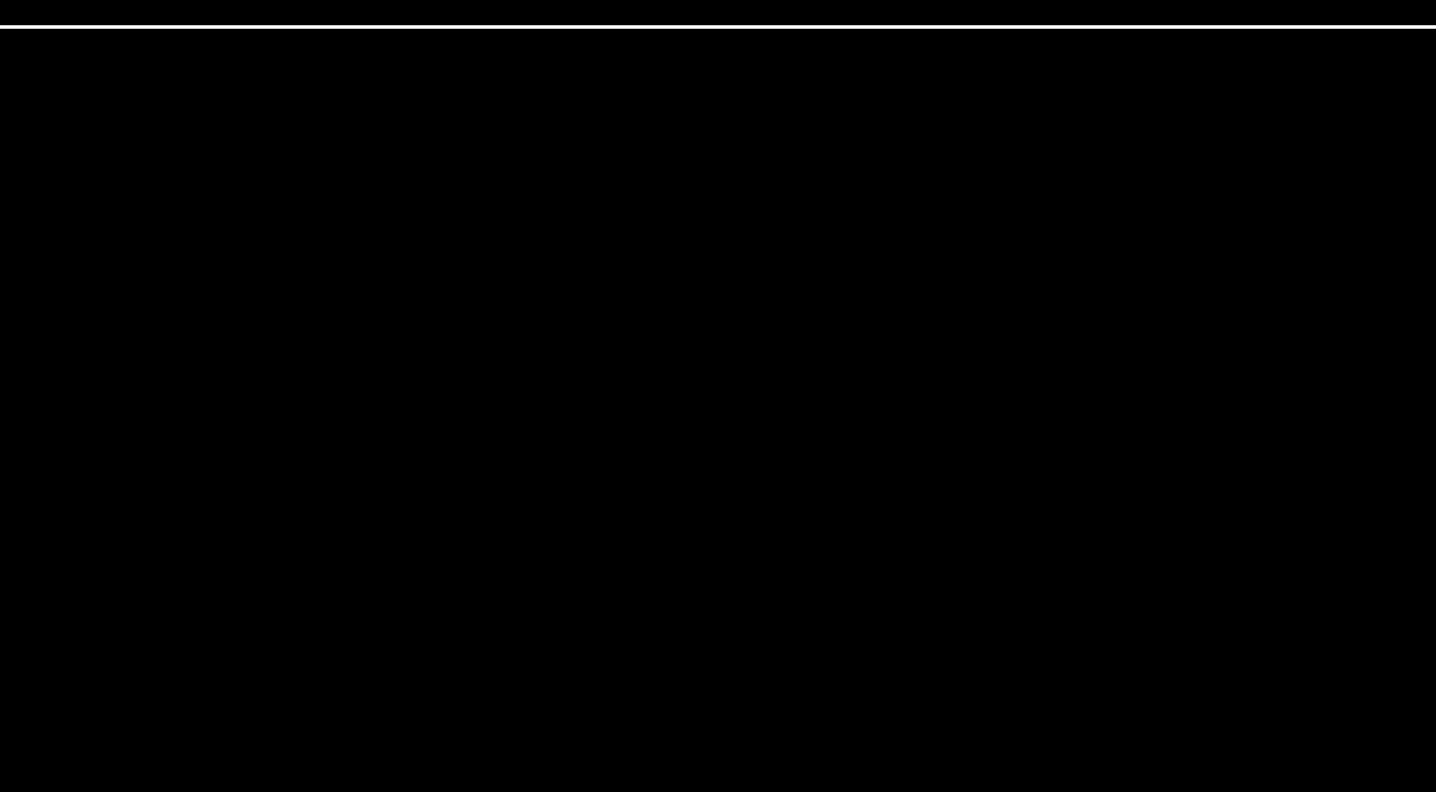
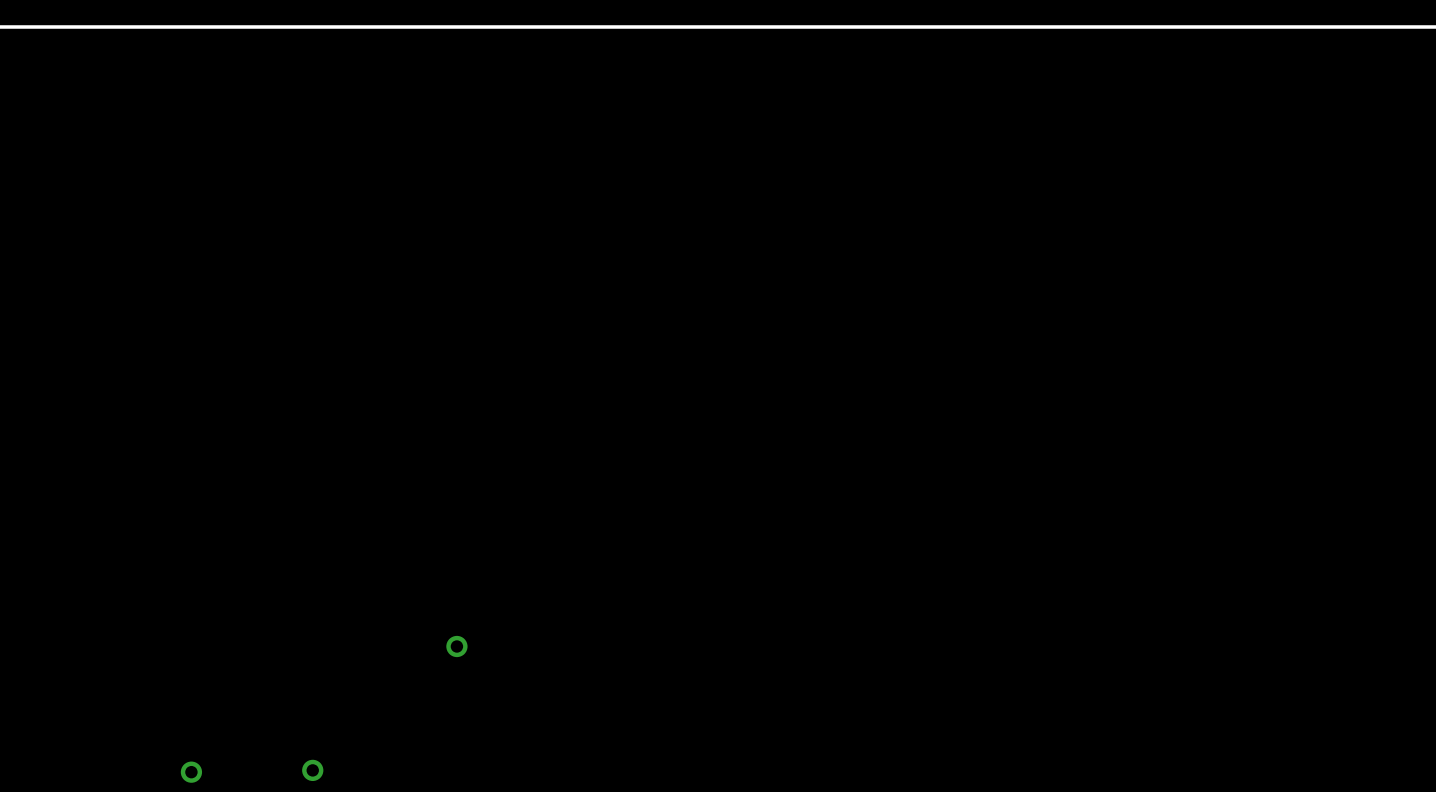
via: none -> (456, 646)
via: none -> (312, 770)
via: none -> (191, 772)

